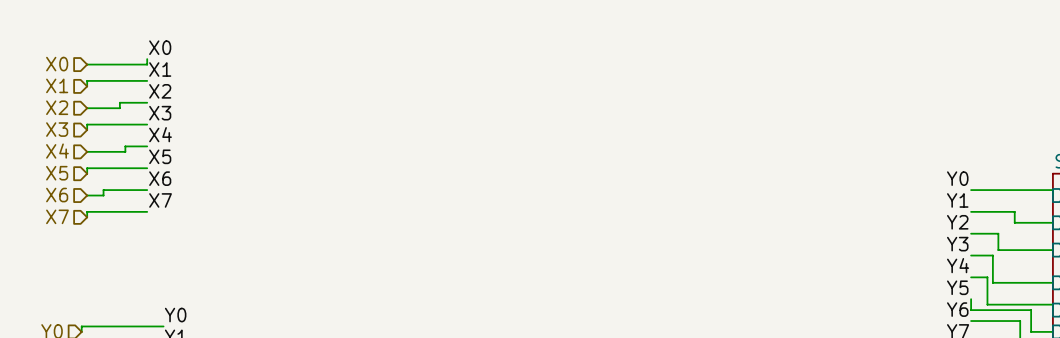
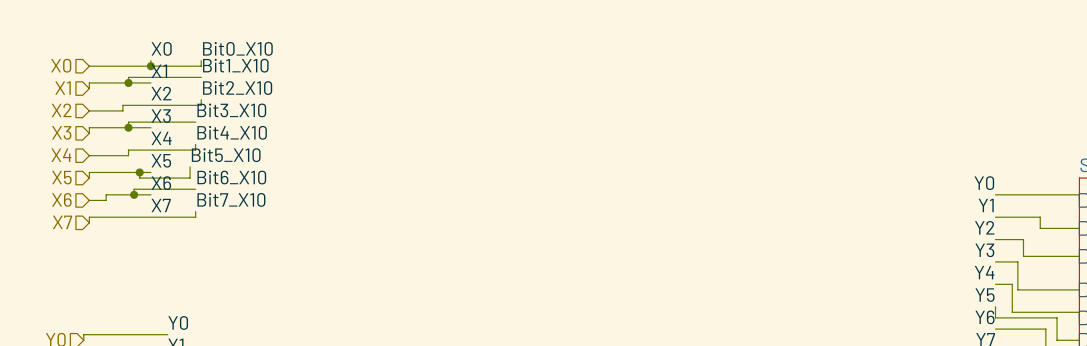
label: none -> Bit0_X10 (237, 48)
wire: none -> (201, 60) (201, 66) (150, 66)
junction: none -> (150, 66)
label: none -> Bit1_X10 (235, 65)
wire: none -> (201, 77) (128, 77) (128, 82)
junction: none -> (128, 82)
label: none -> Bit2_X10 (237, 88)
wire: none -> (201, 99) (201, 105) (150, 105)
label: none -> Bit3_X10 (231, 110)
wire: none -> (195, 122) (128, 122) (128, 127)
junction: none -> (128, 127)
label: none -> Bit4_X10 (232, 132)
wire: none -> (195, 144) (195, 150) (150, 150)
label: none -> Bit5_X10 (226, 155)
wire: none -> (190, 166) (190, 178) (139, 178) (139, 172)
junction: none -> (139, 172)
label: none -> Bit6_X10 (231, 177)
wire: none -> (195, 189) (134, 189) (134, 194)
junction: none -> (134, 194)
label: none -> Bit7_X10 (231, 199)
wire: none -> (195, 211) (195, 217) (150, 217)

